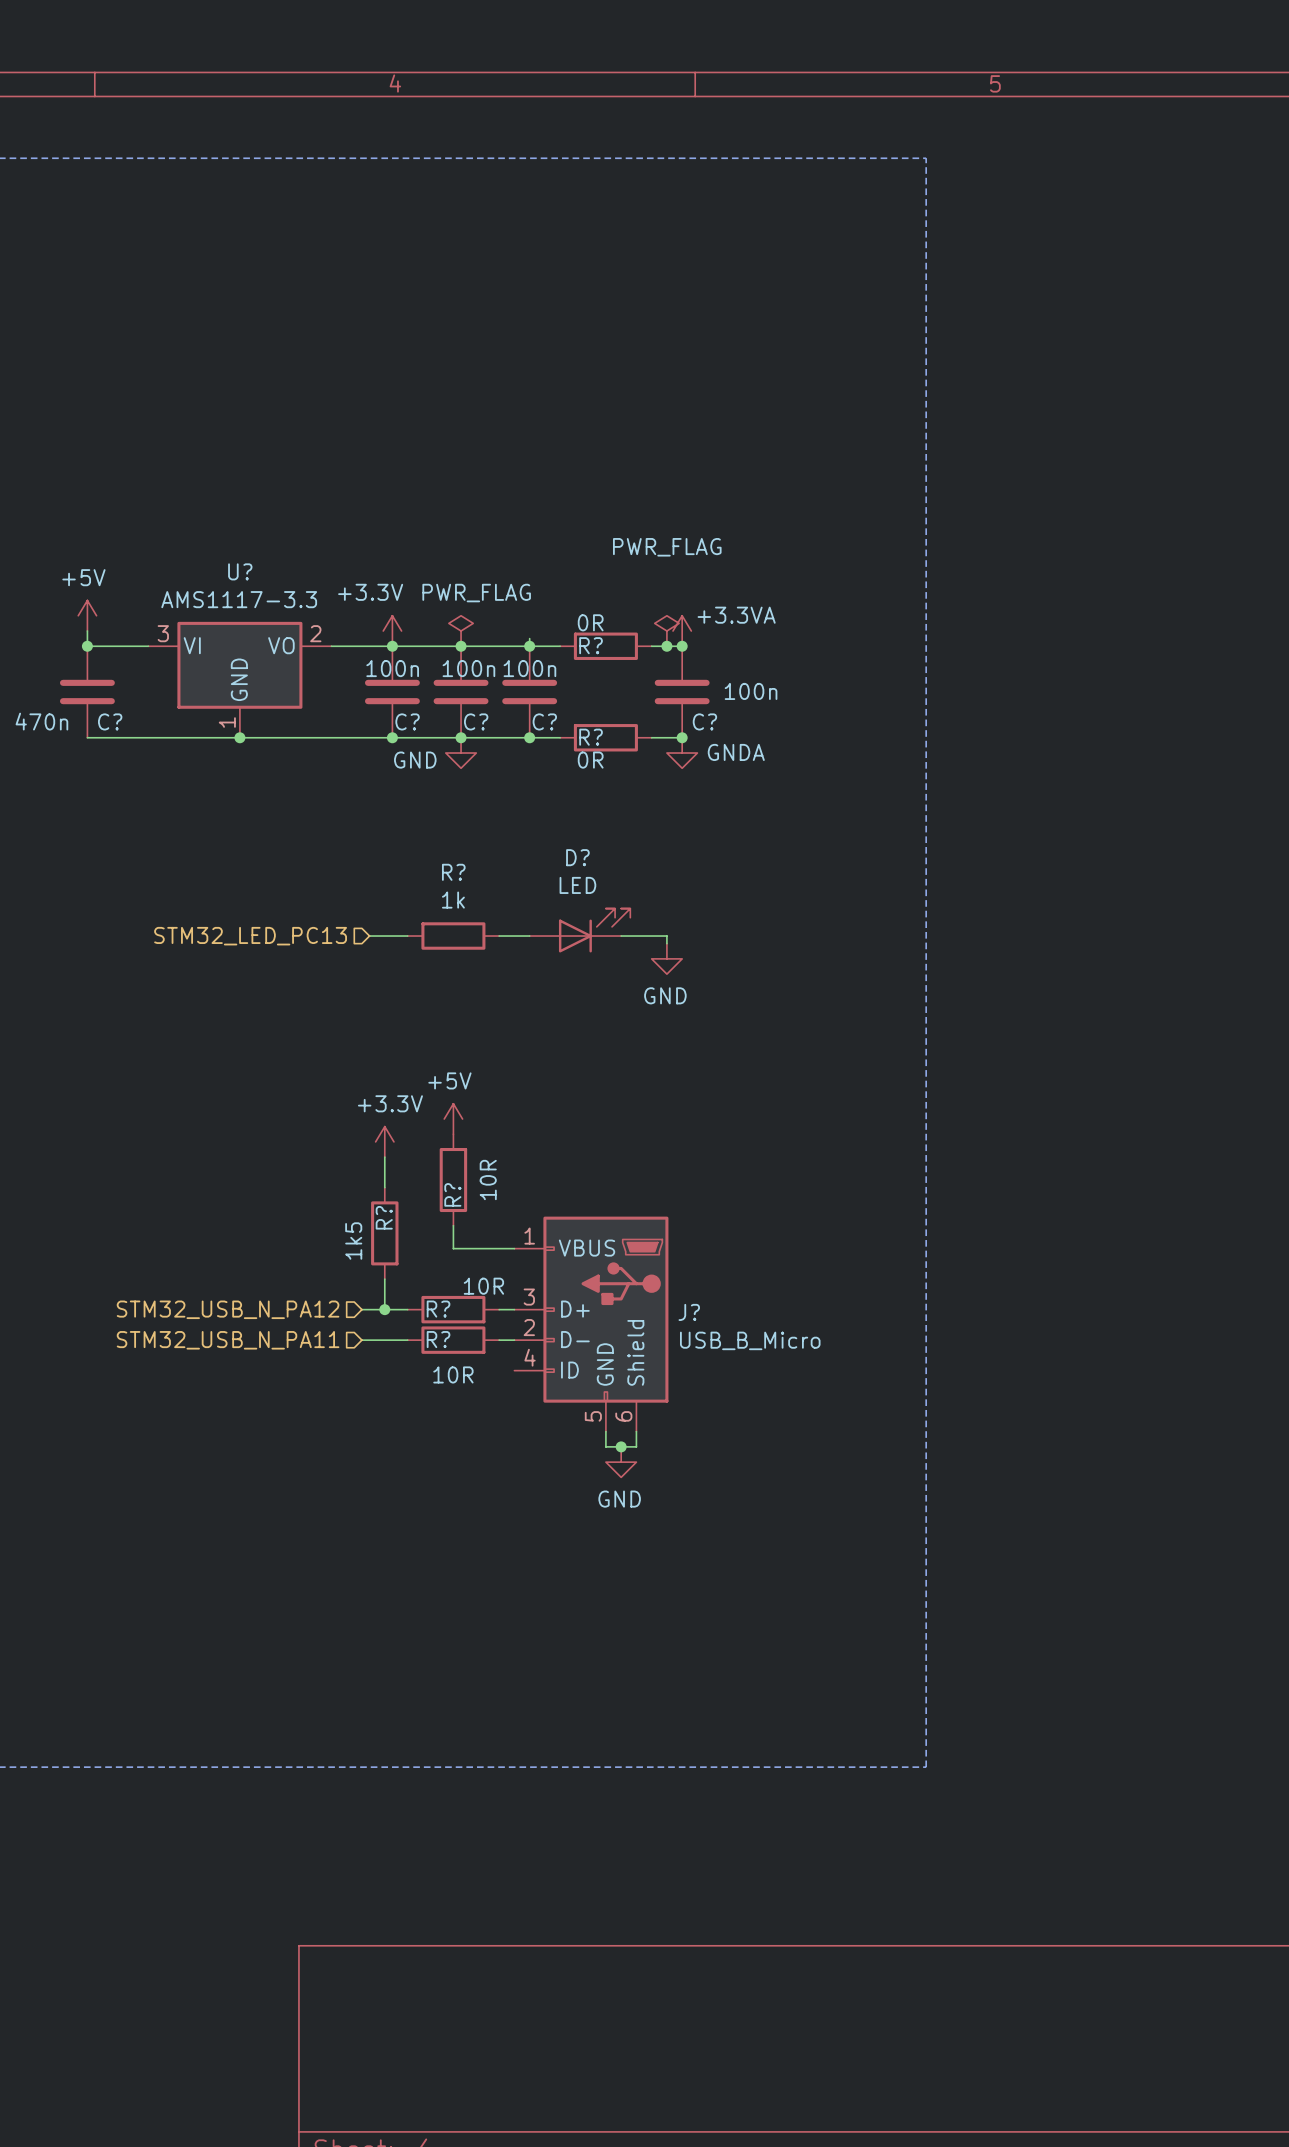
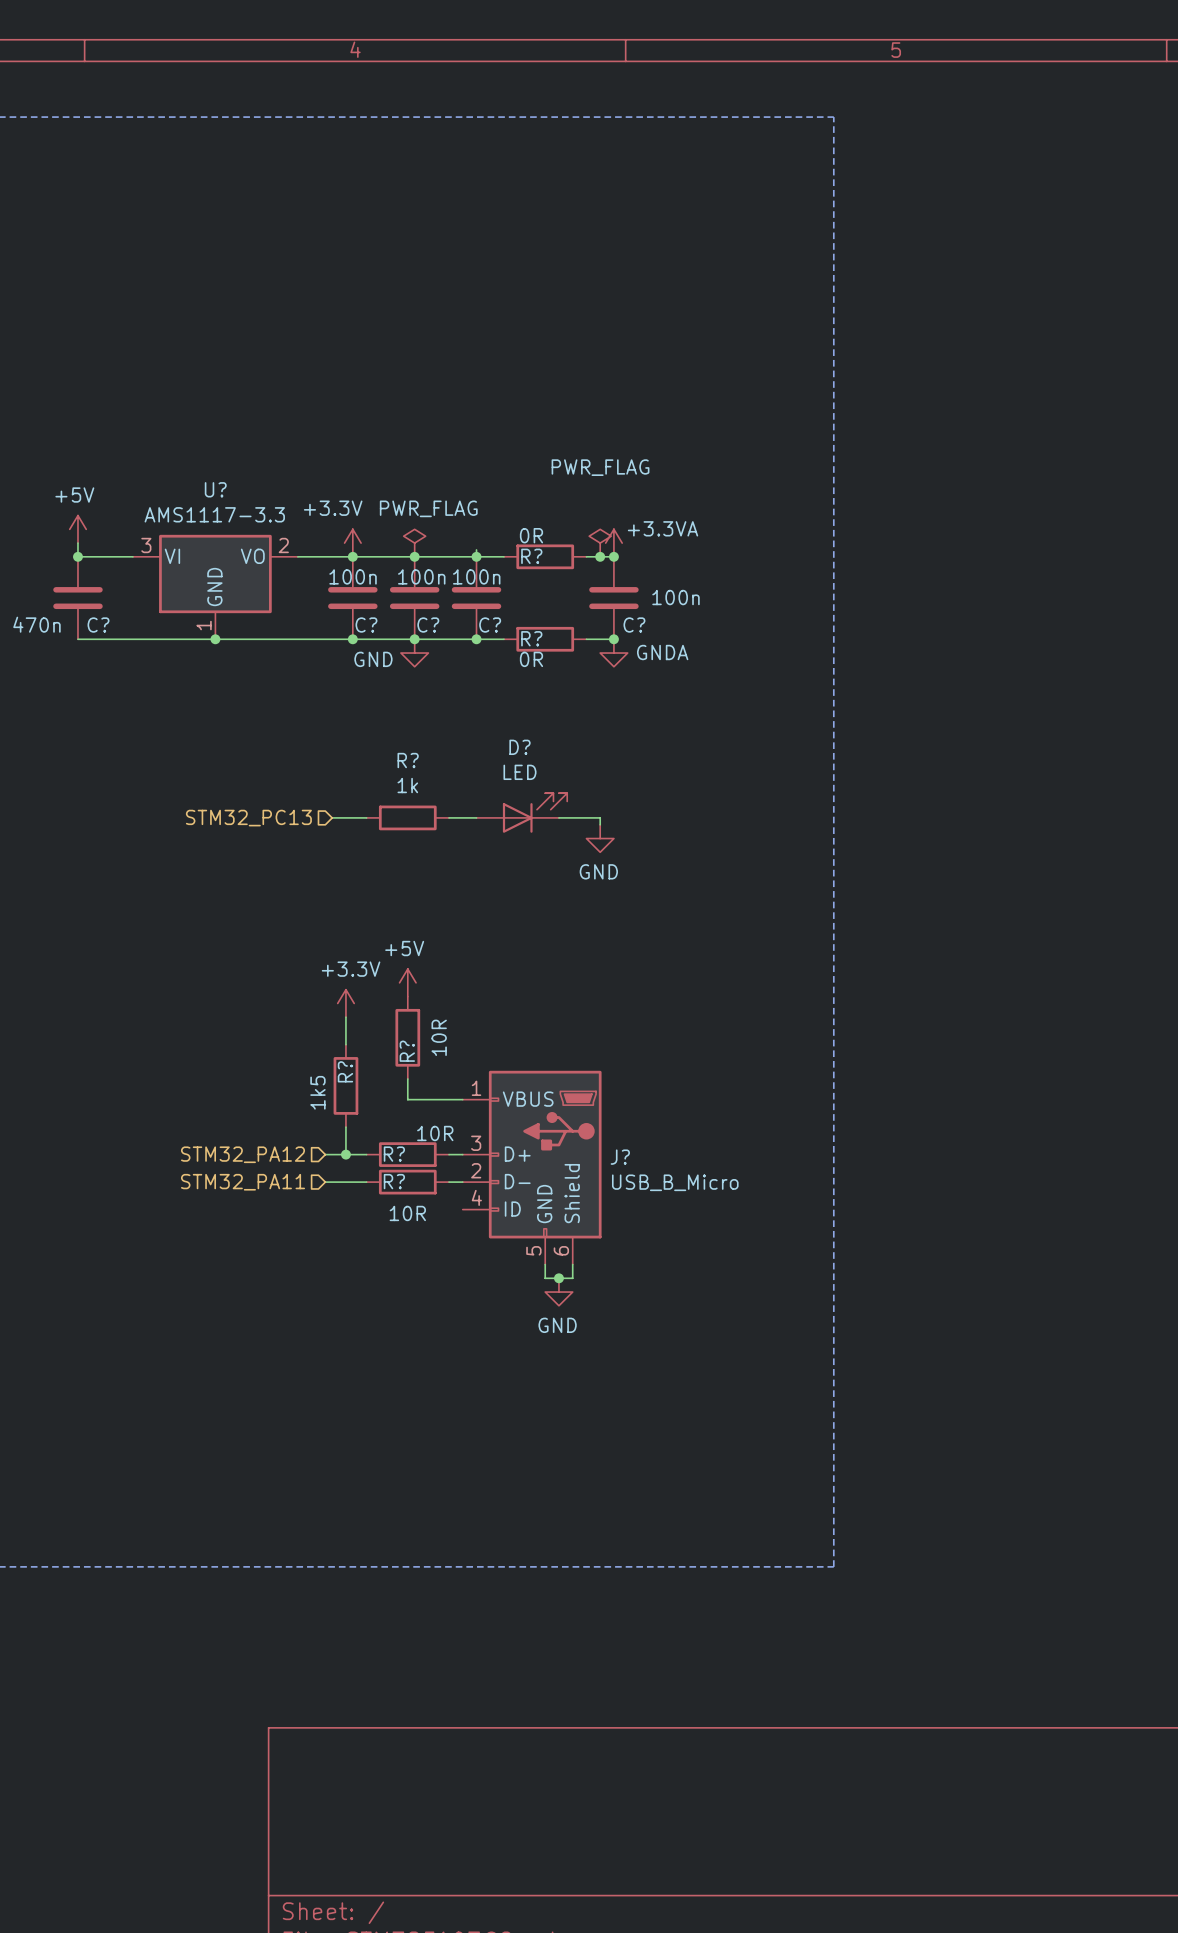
hierarchical label: STM32_LED_PC13 (250, 936) -> STM32_PC13 (248, 818)
hierarchical label: STM32_USB_N_PA12 (228, 1309) -> STM32_PA12 (243, 1154)
hierarchical label: STM32_USB_N_PA11 (228, 1340) -> STM32_PA11 (243, 1182)

